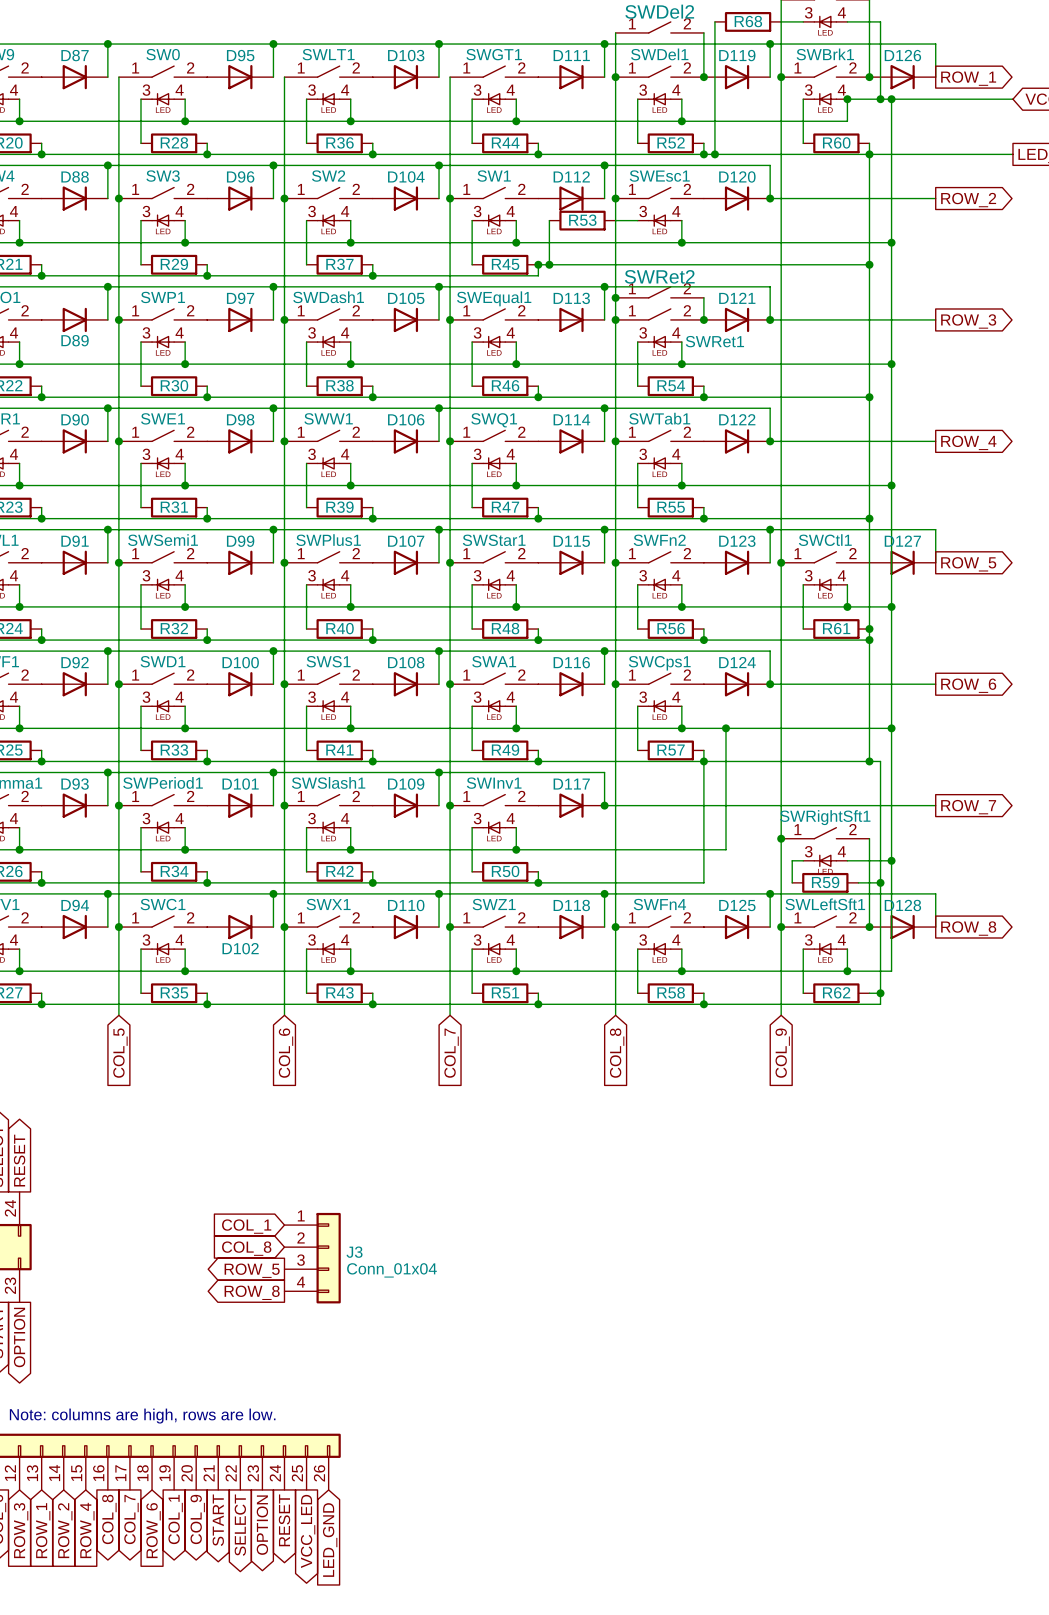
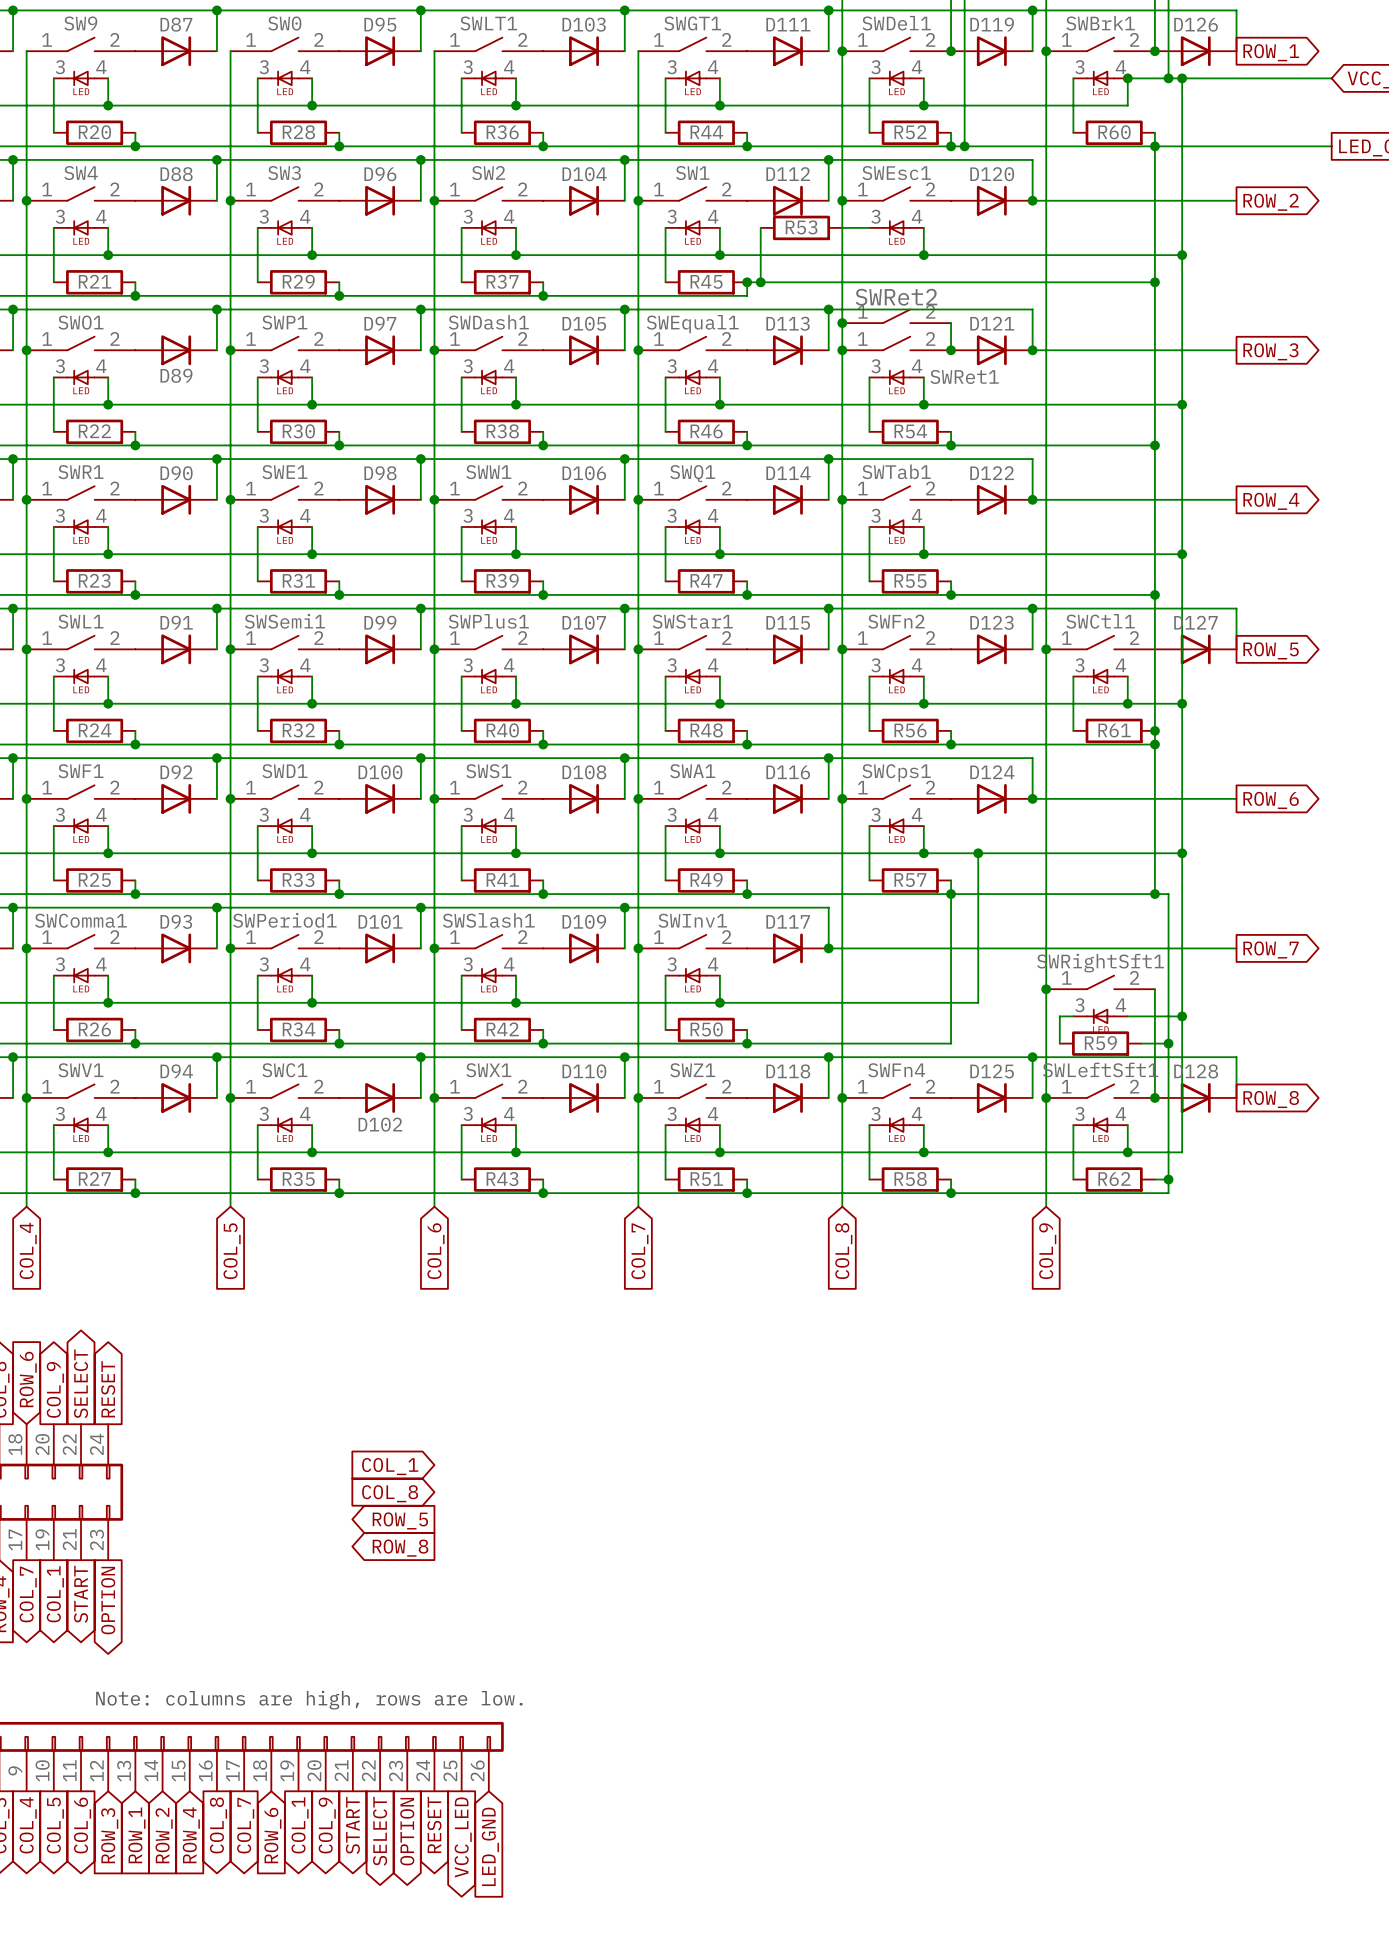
J3: Conn_01x04 (312, 1258) -> none

